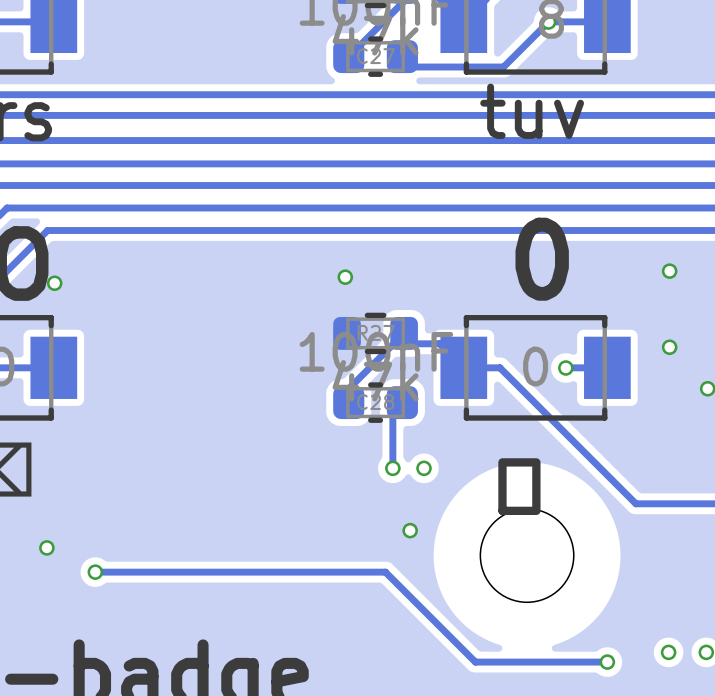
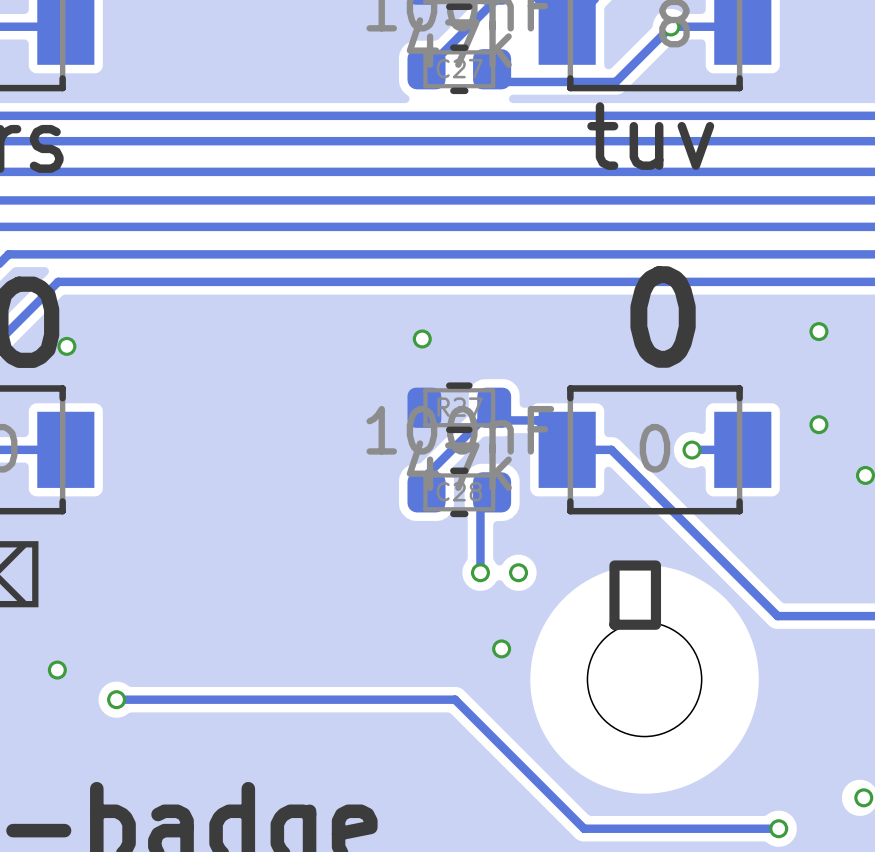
track: (372, 572) (385, 572) (475, 662) (607, 662) -> (455, 699) (584, 828) (778, 828)
via: (668, 652) -> none
via: (607, 662) -> none
via: none -> (778, 828)

